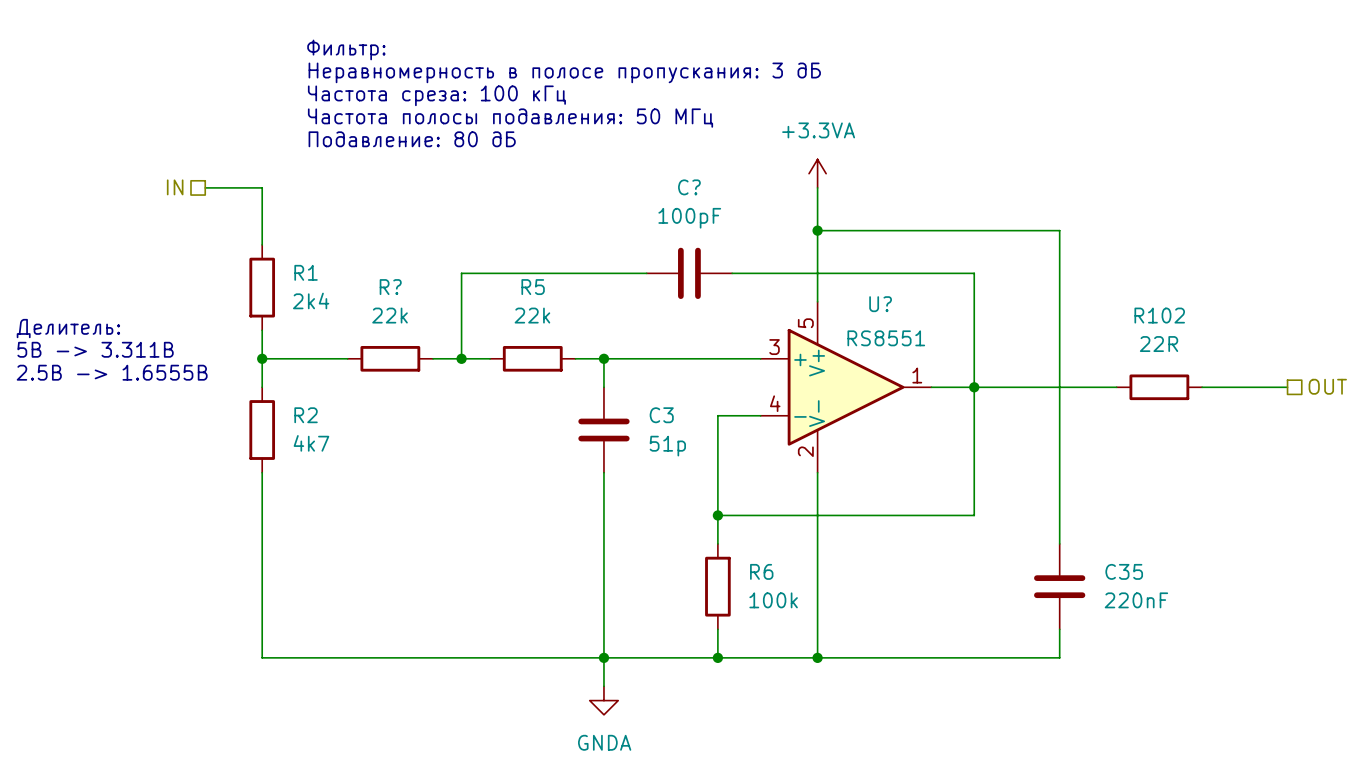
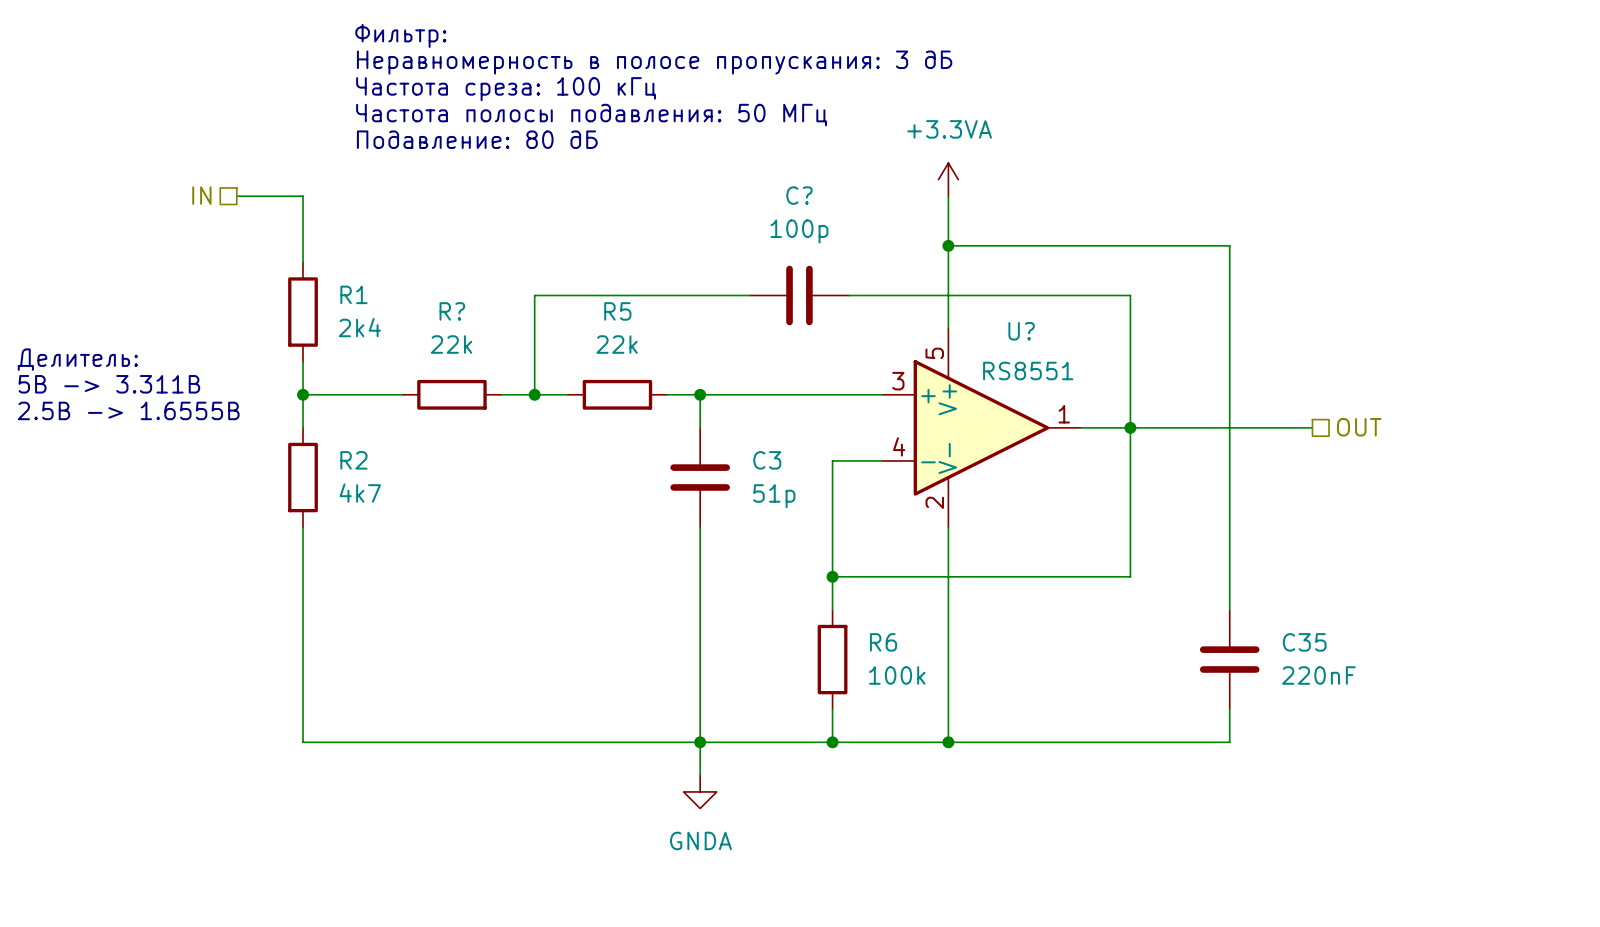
C? value: 100pF (689, 218) -> 100p (799, 231)
hierarchical label position: OUT (1327, 386) -> OUT (1359, 427)
R102: 22R (1159, 387) -> none
wire: (1202, 387) (1287, 387) -> none

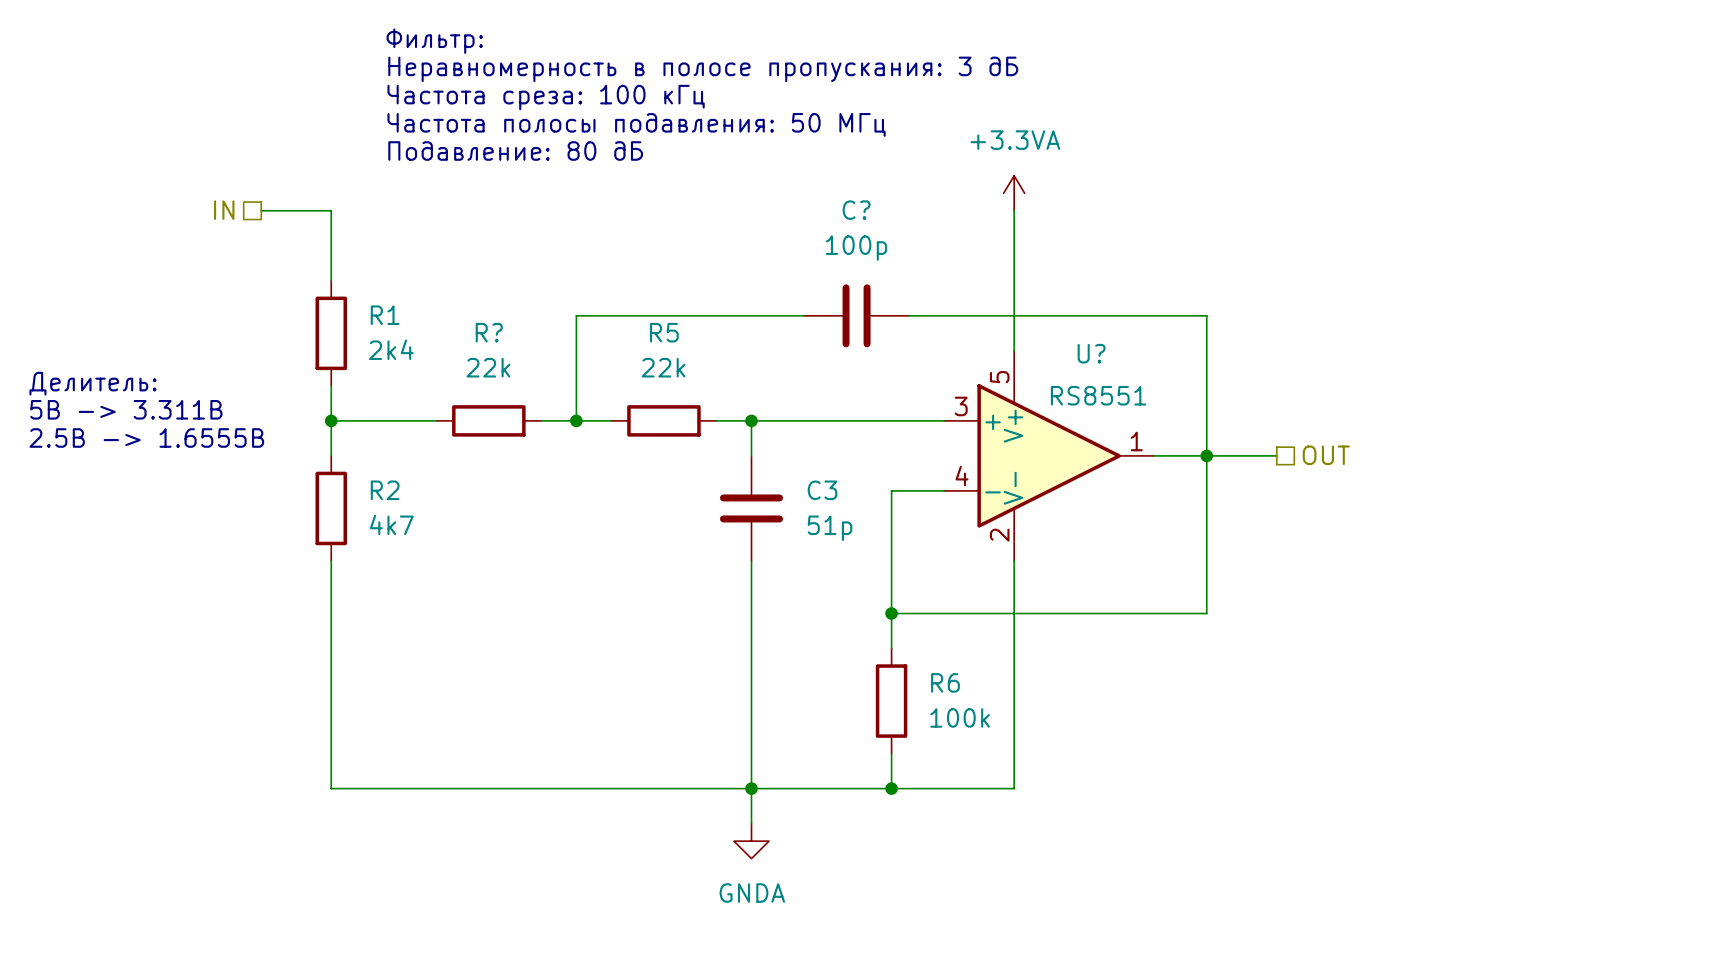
wire: (948, 245) (1229, 245) (1229, 609) -> none
junction: (948, 245) -> none
wire: (1196, 427) (1312, 427) -> none
hierarchical label position: OUT (1359, 427) -> OUT (1326, 455)
C35: 220nF (1229, 659) -> none
wire: (1229, 709) (1229, 742) (948, 742) -> none
junction: (948, 742) -> none

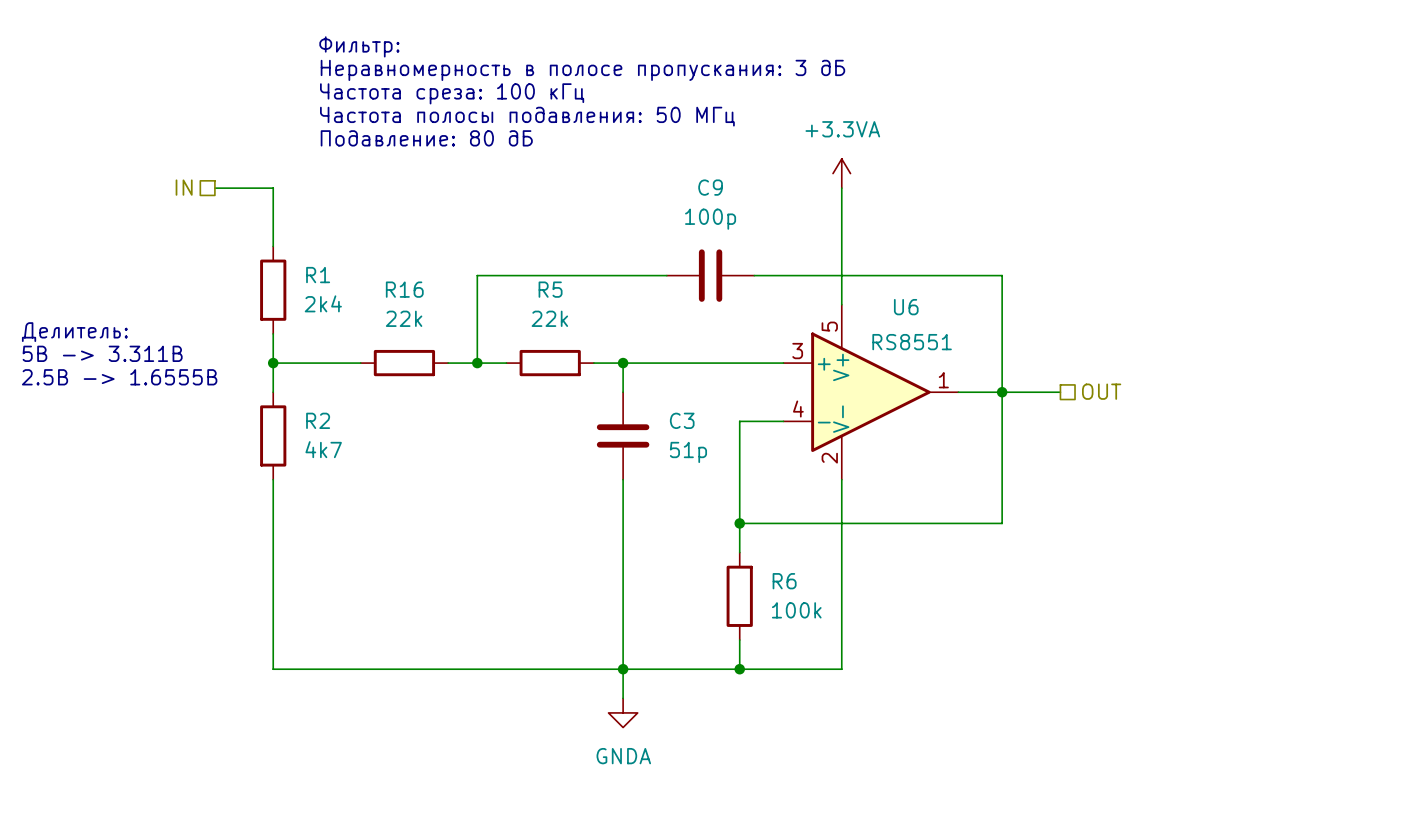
C? name: C? (856, 210) -> C9 (710, 187)
R? name: R? (489, 332) -> R16 (404, 289)
U? name: U? (1091, 353) -> U6 (906, 307)

